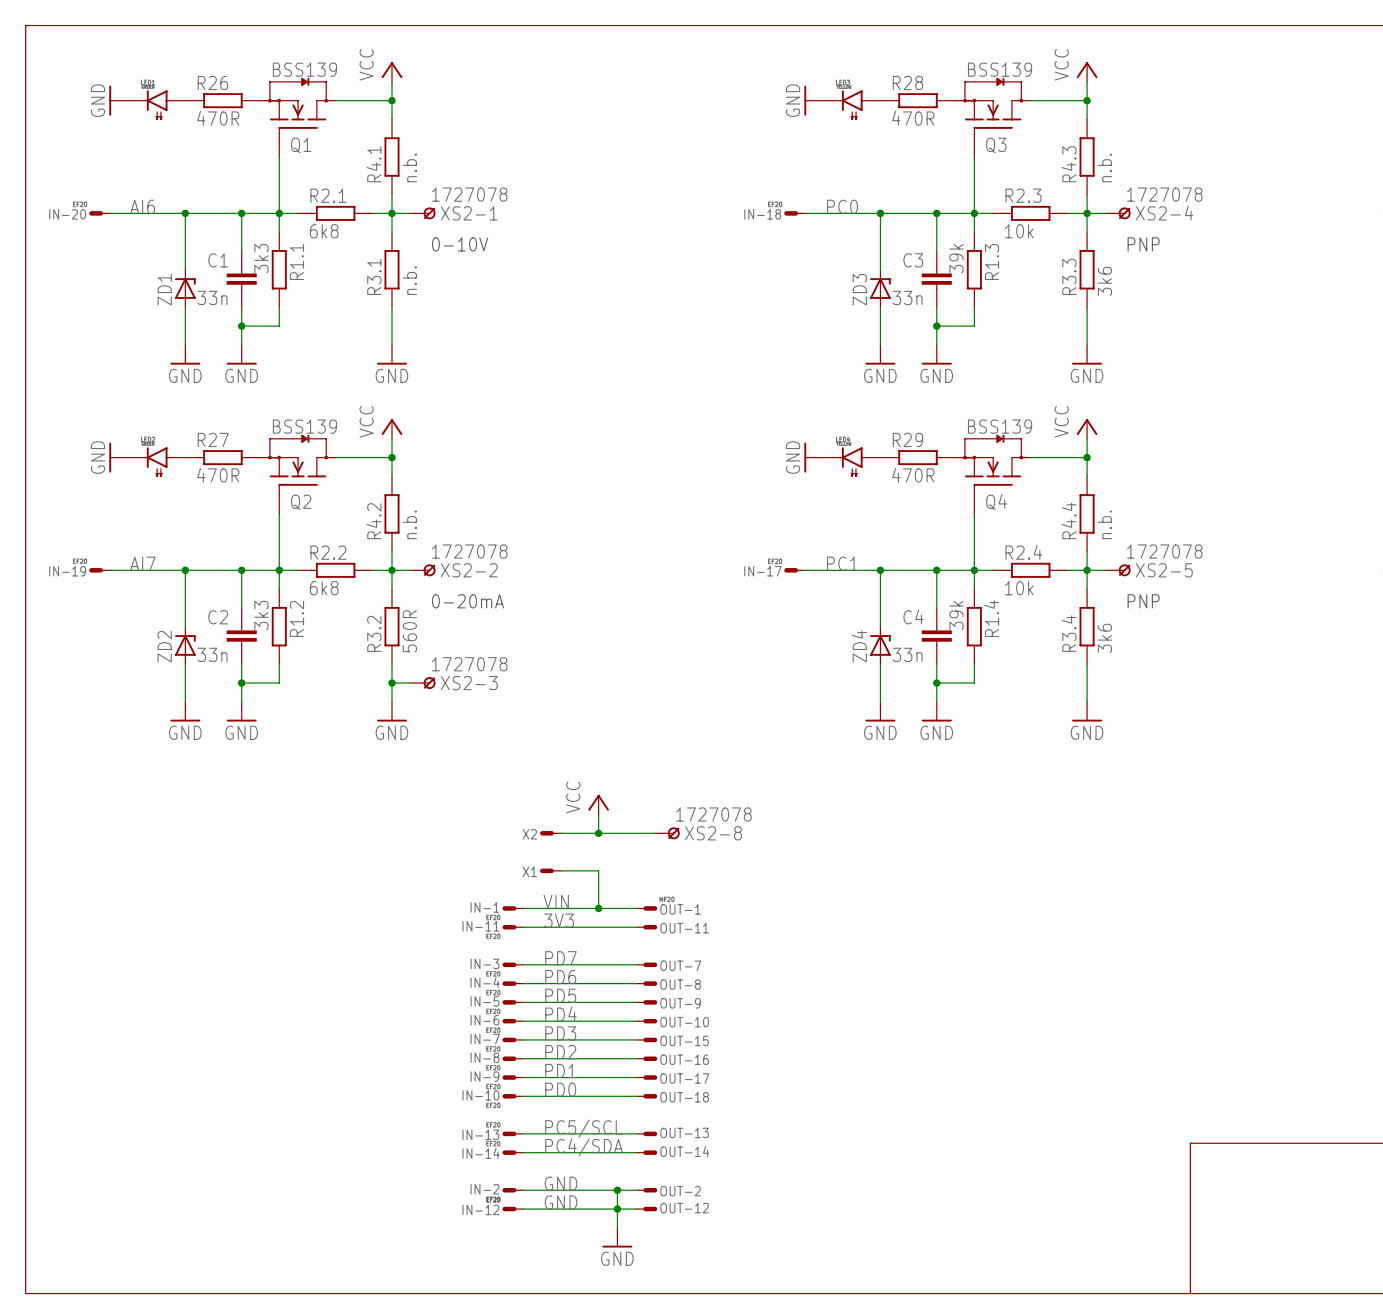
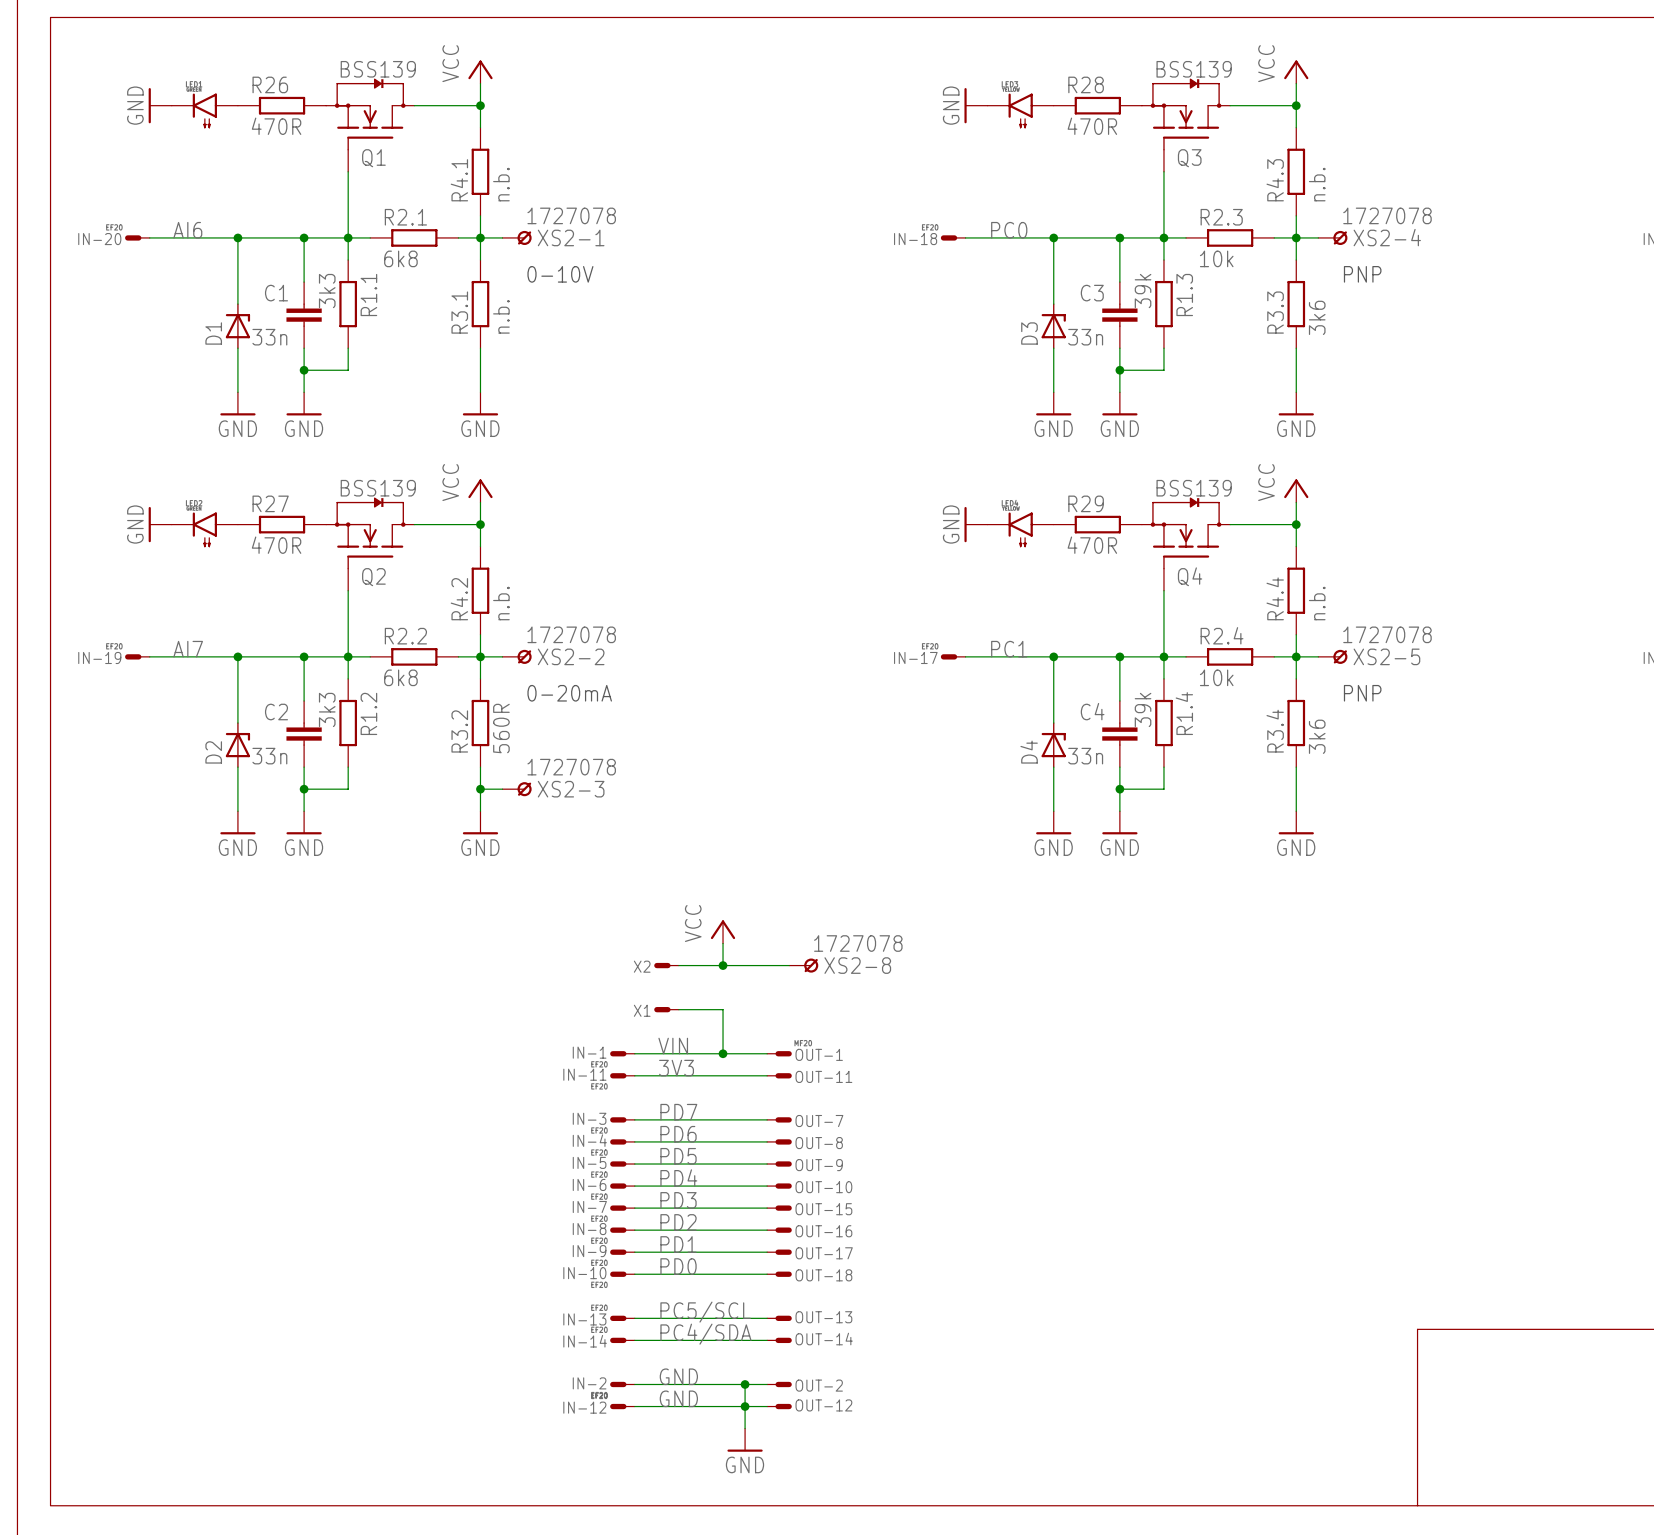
ZD1 name: ZD1 (164, 289) -> D1 (213, 333)
ZD3 name: ZD3 (859, 289) -> D3 (1029, 333)
ZD2 name: ZD2 (164, 646) -> D2 (213, 752)
ZD4 name: ZD4 (859, 646) -> D4 (1029, 752)

